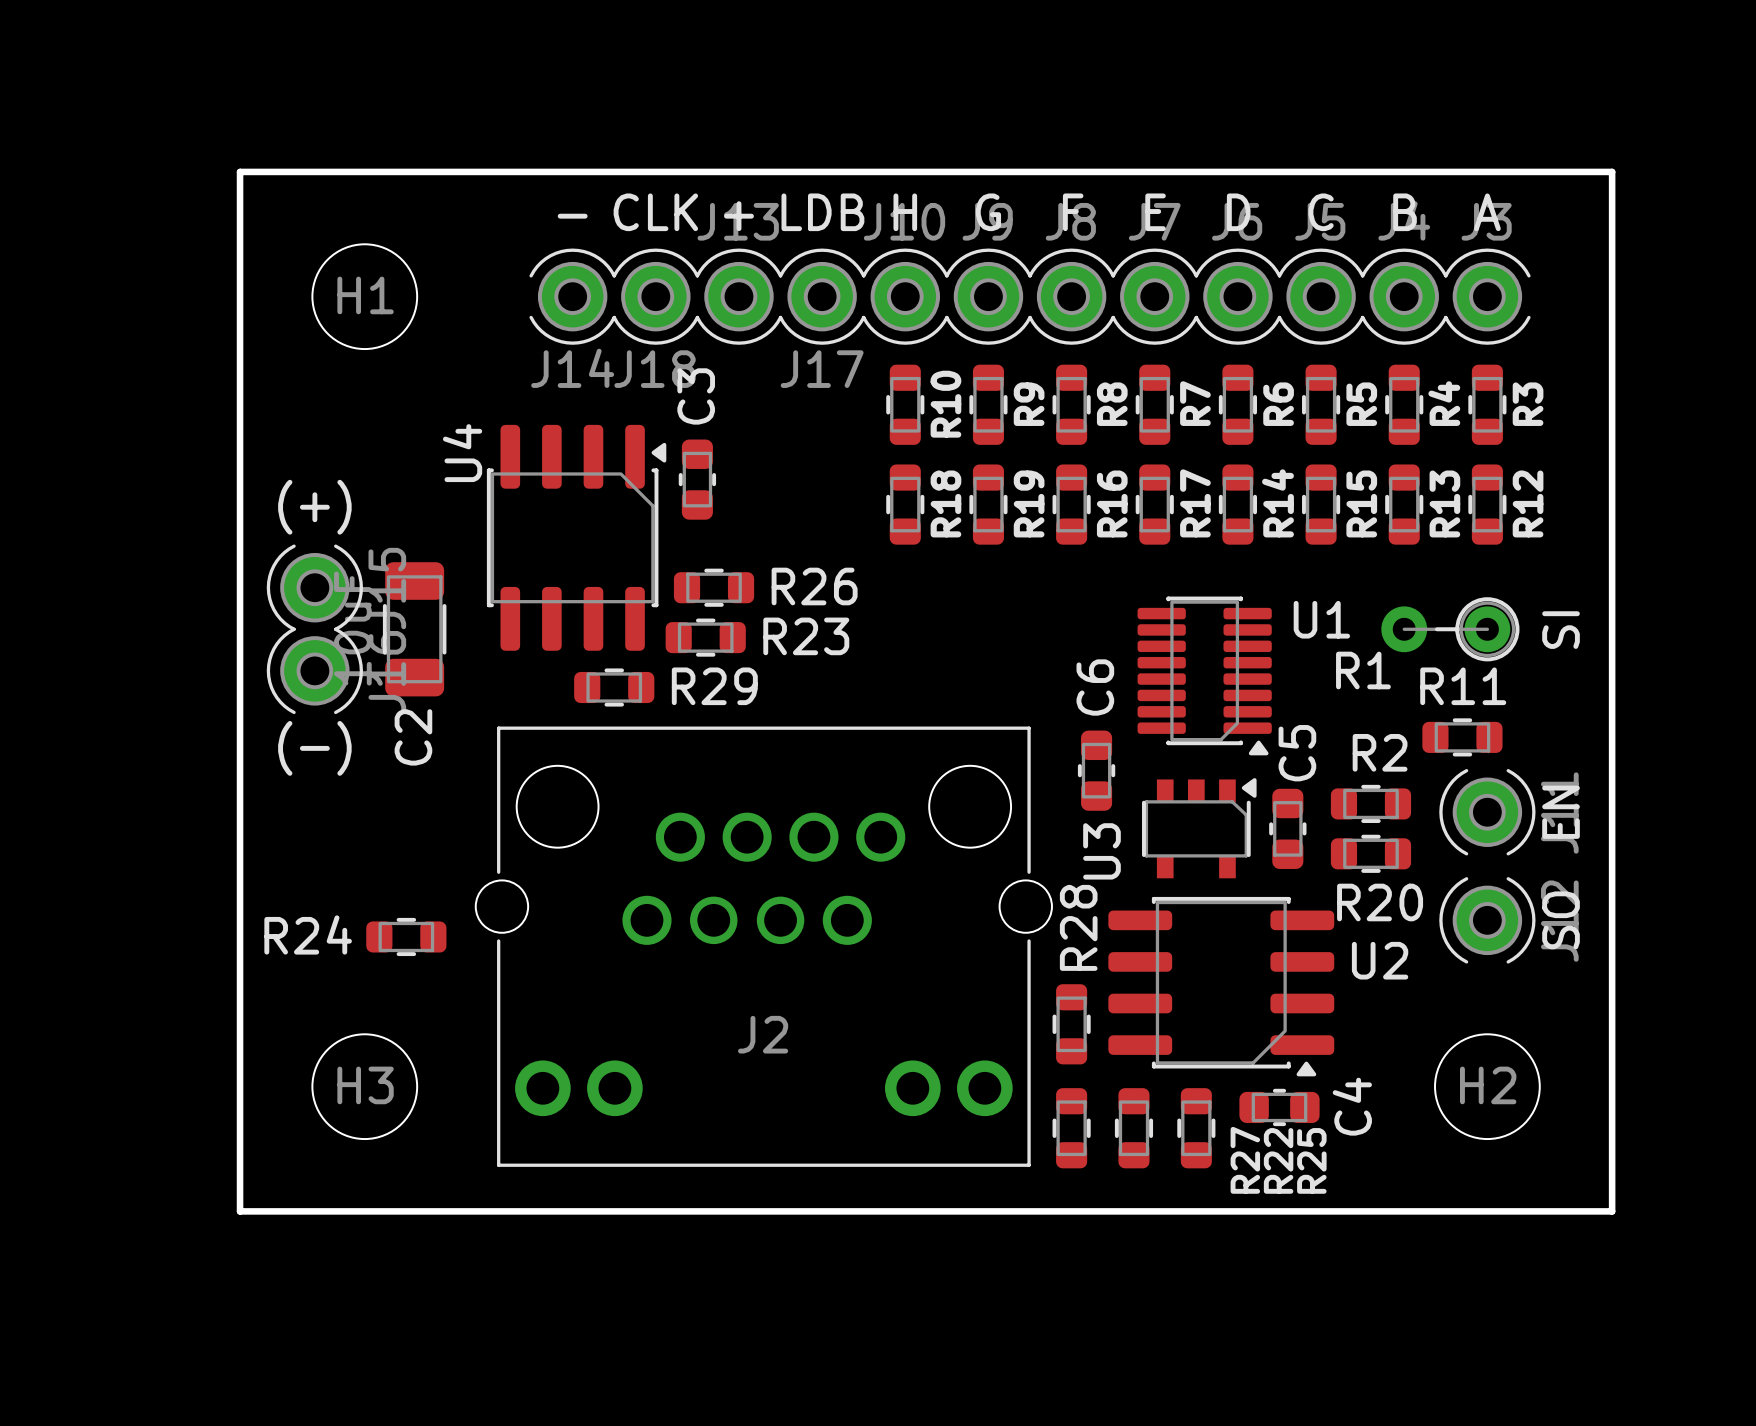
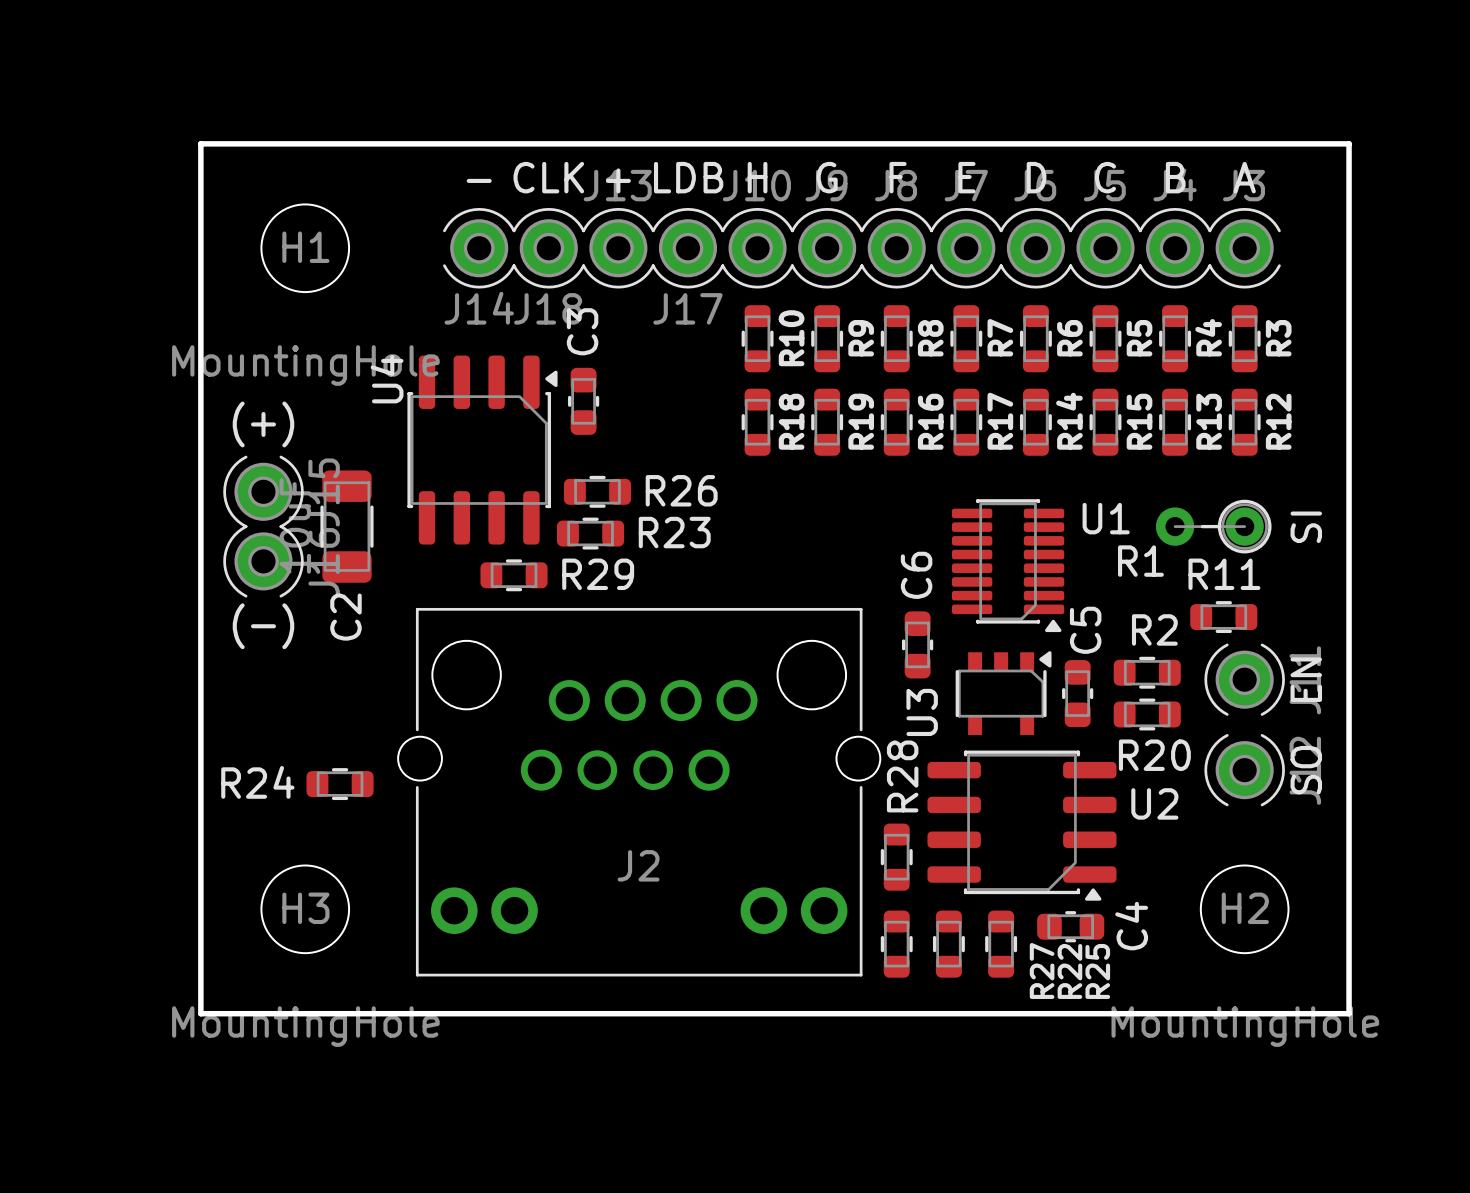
H1 value: none -> MountingHole (305, 365)
H3 value: none -> MountingHole (305, 1026)
H2 value: none -> MountingHole (1245, 1026)

